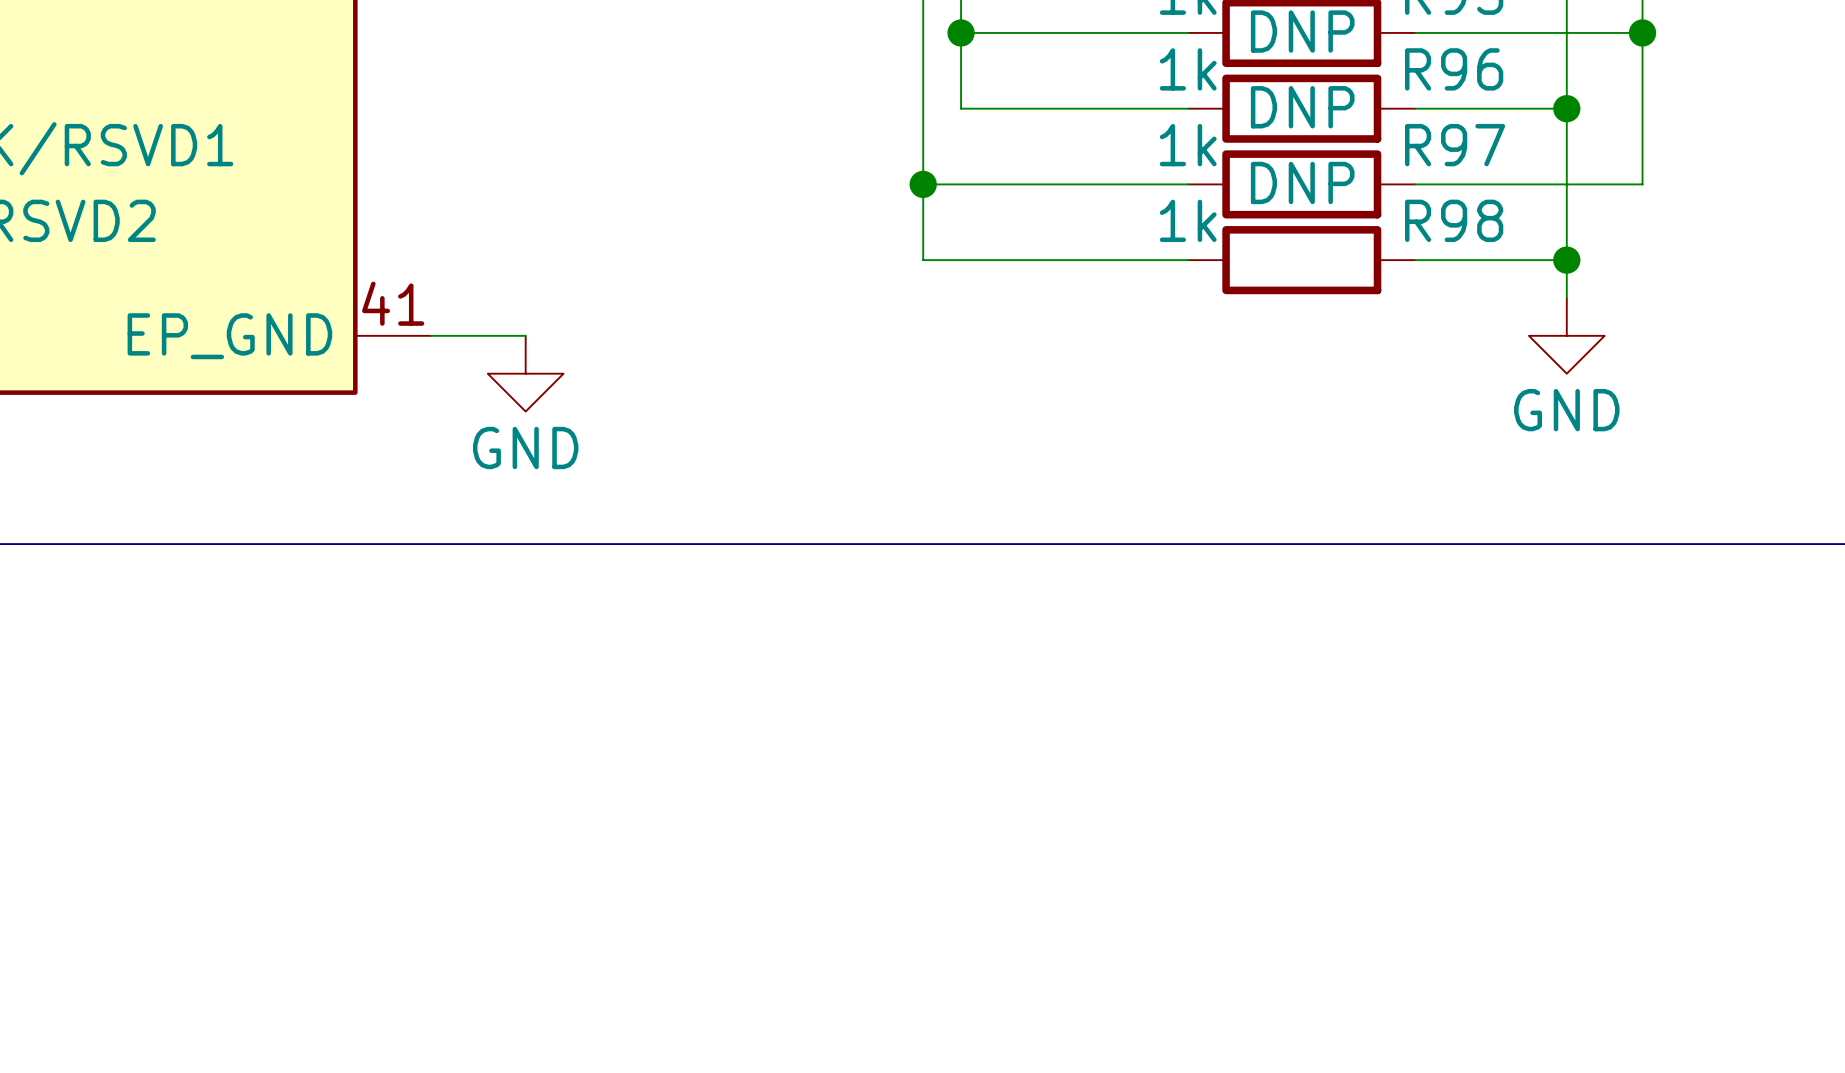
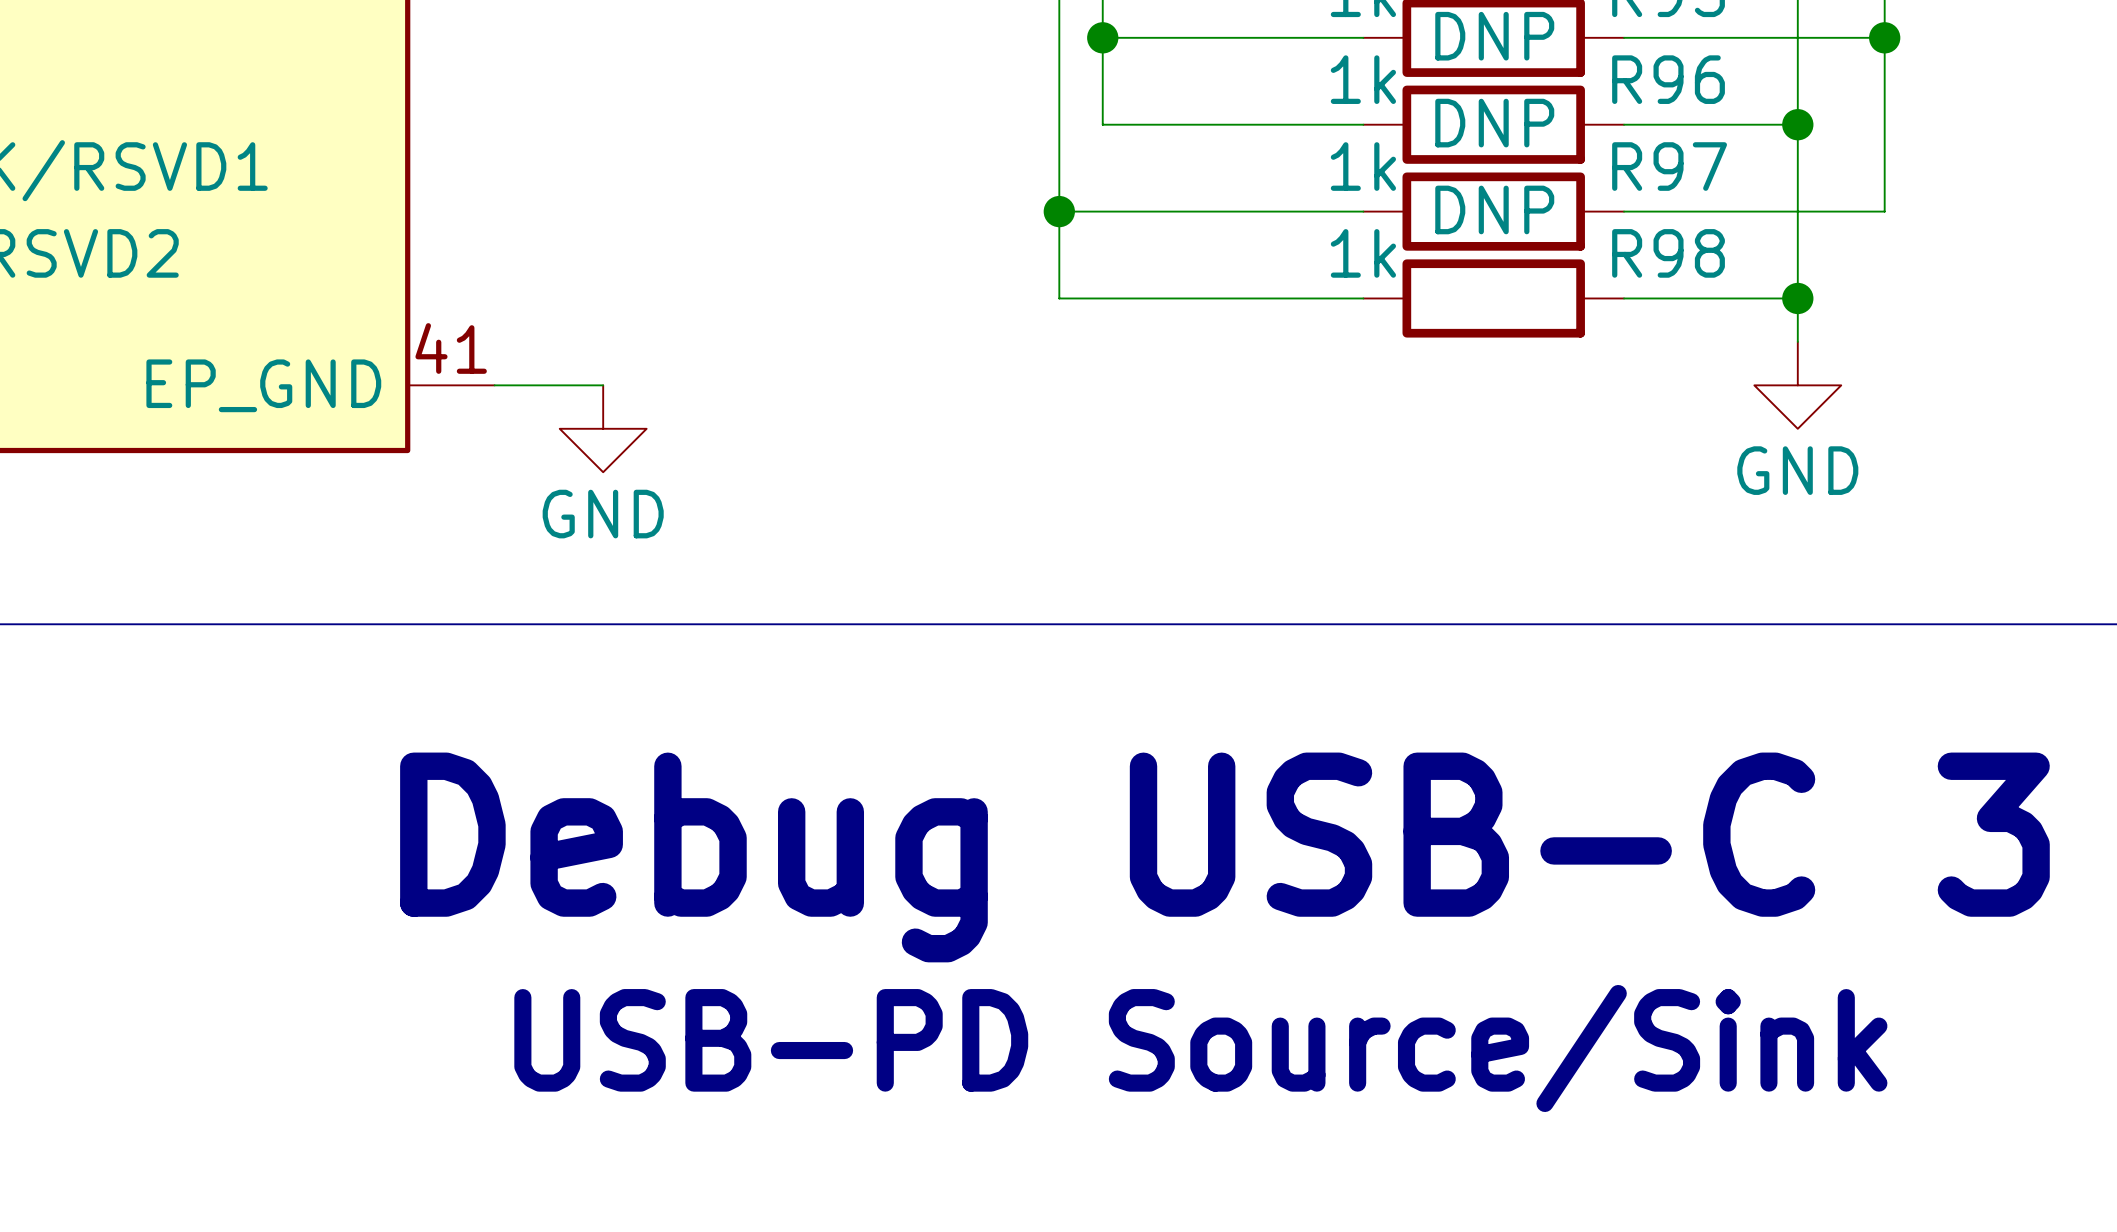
text: none -> Debug USB-C 3 (1224, 857)
text: none -> USB-PD Source/Sink (1200, 1048)

